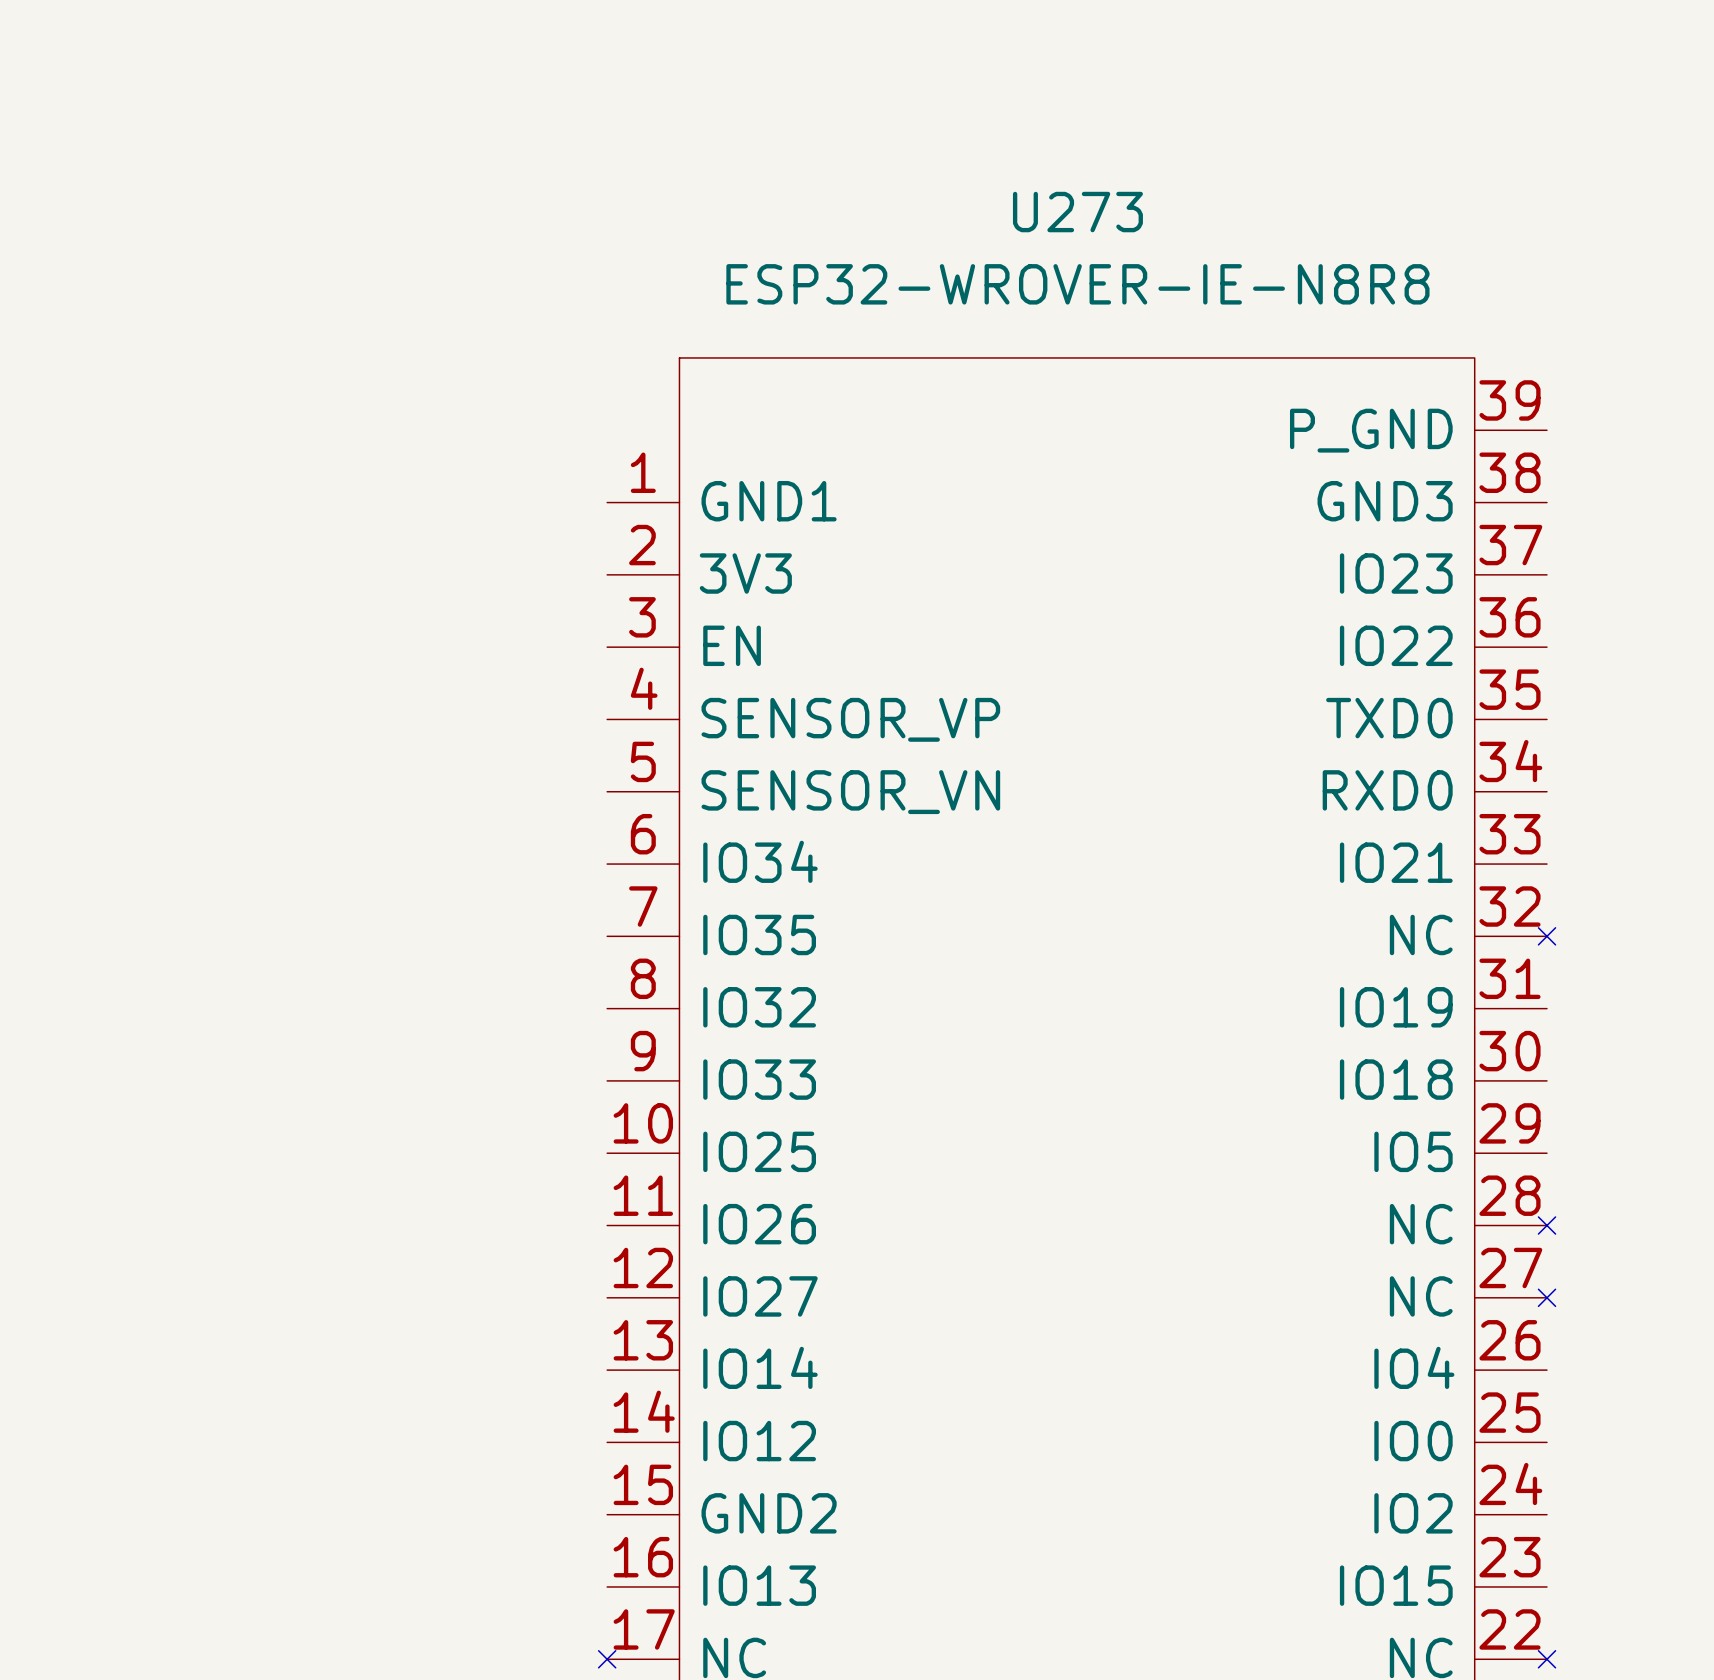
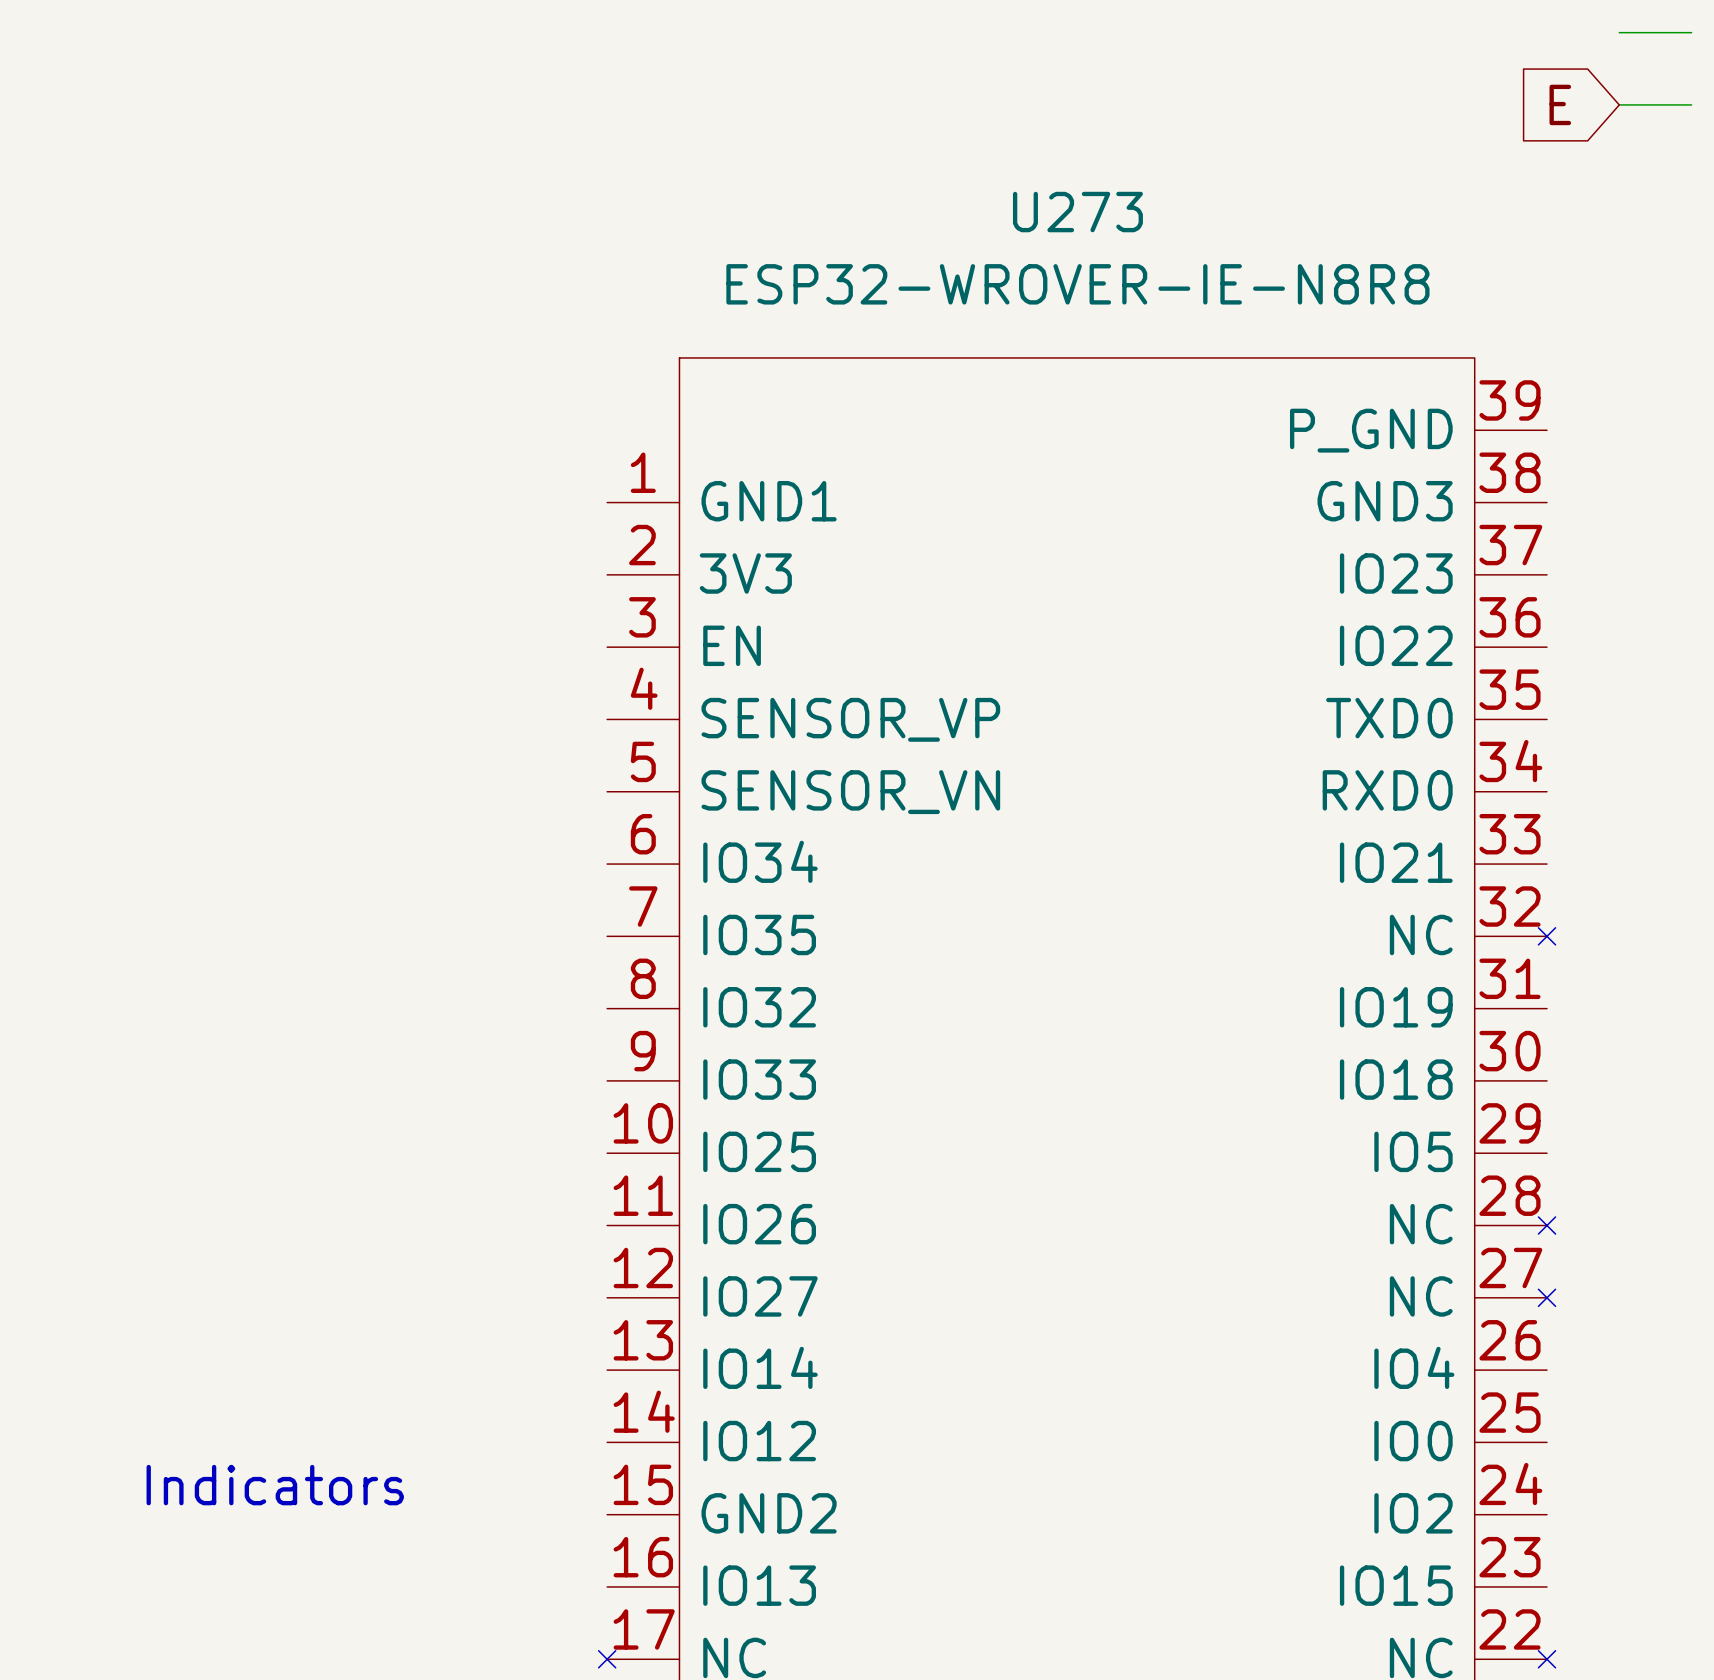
wire: none -> (1619, 32) (1691, 32)
global label: none -> E (1560, 104)
wire: none -> (1619, 104) (1691, 104)
text: none -> Indicators (275, 1485)

